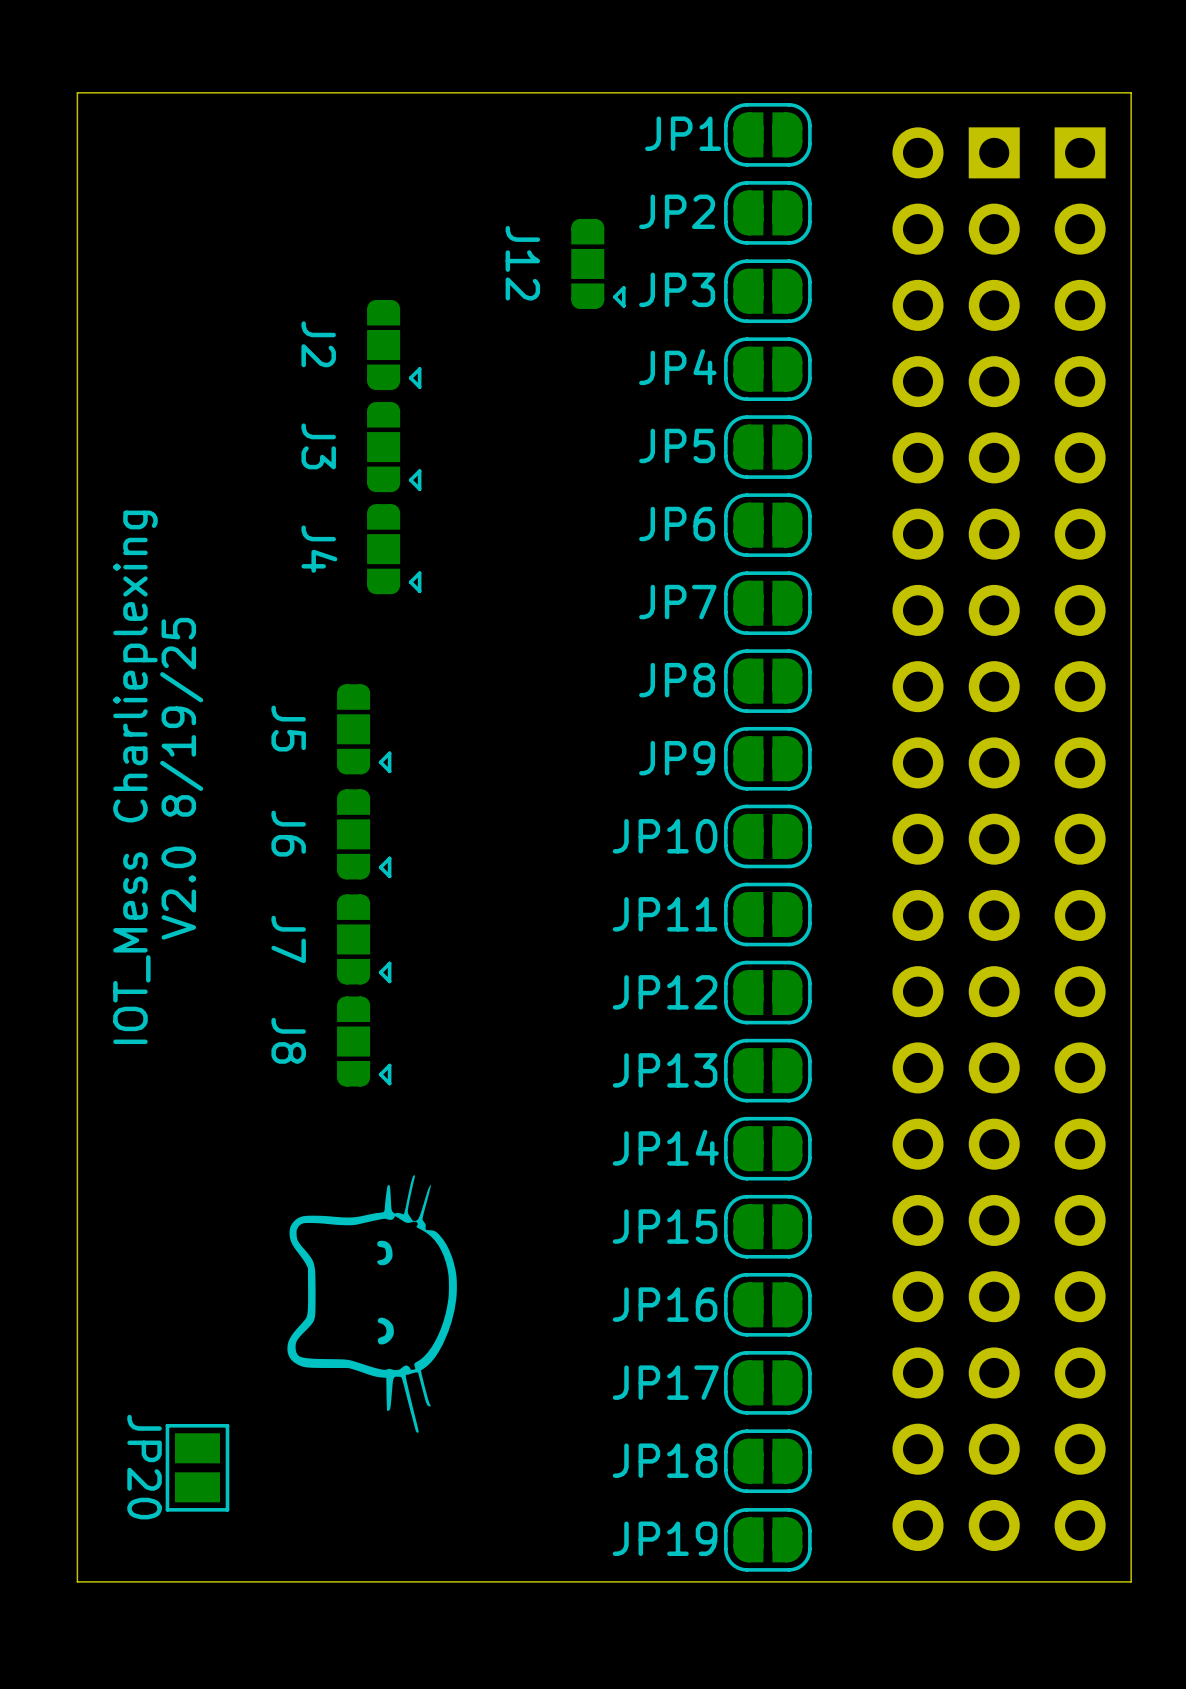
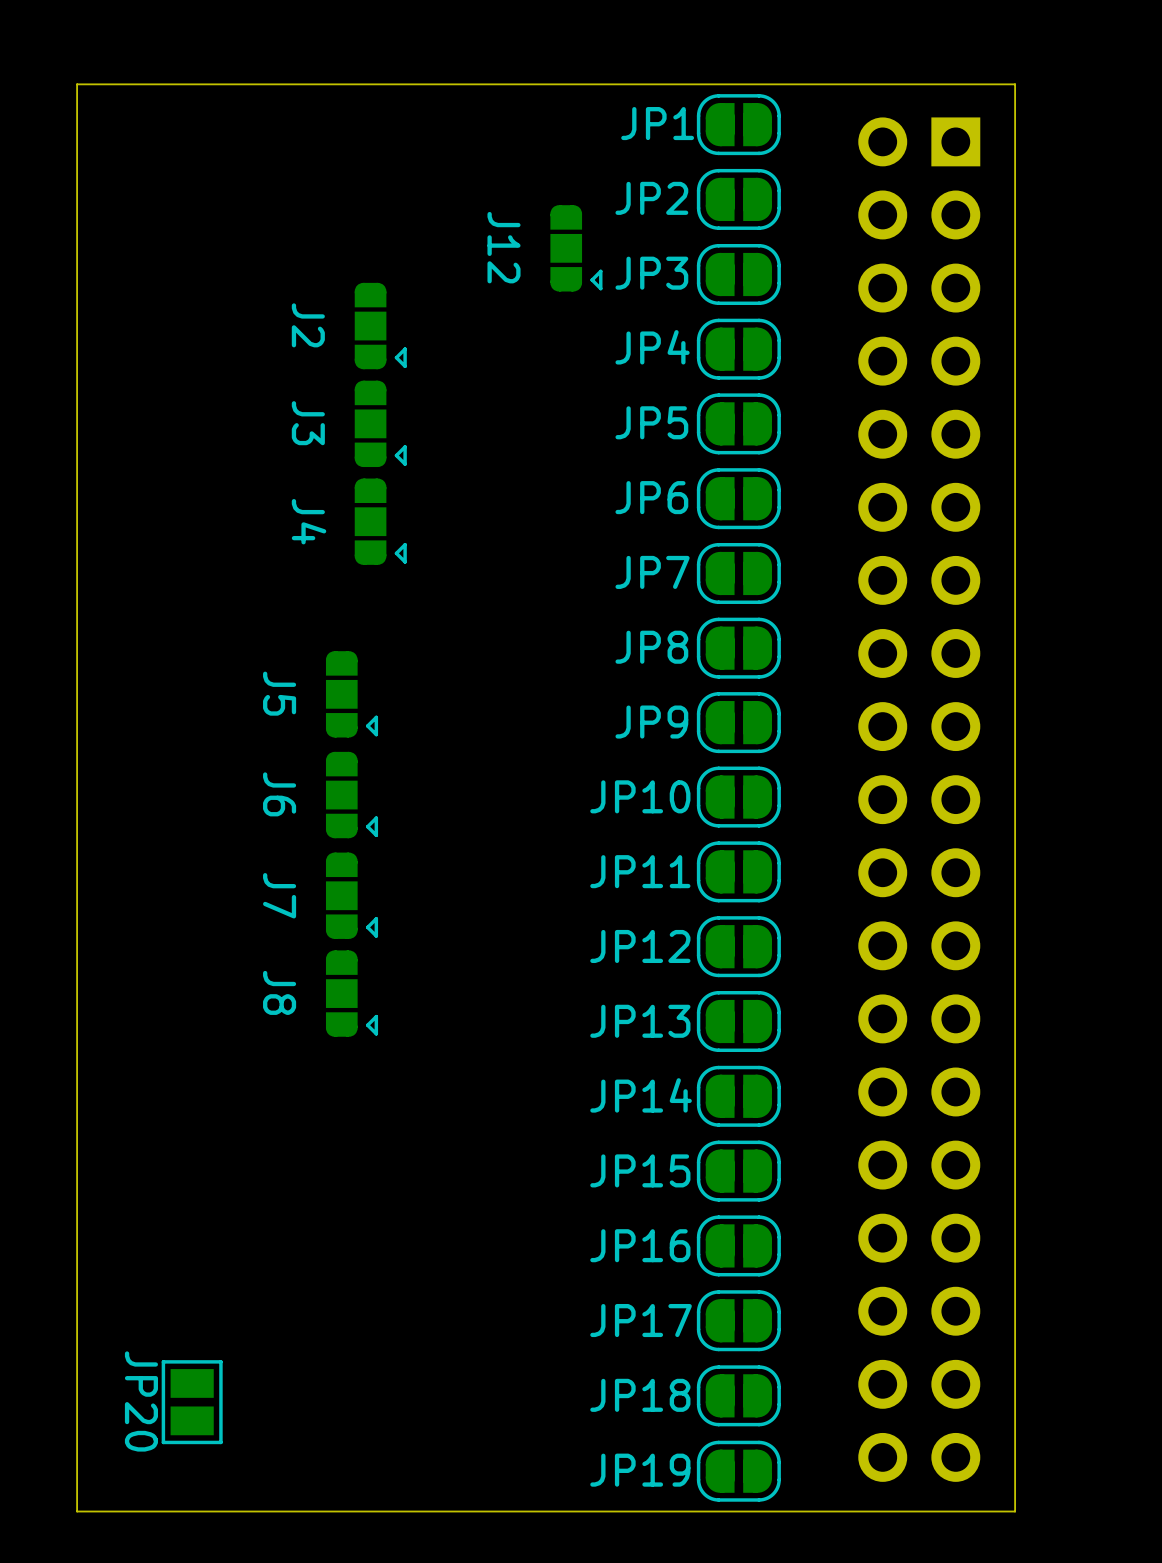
board edge: (1056, 92) (1131, 92) (1131, 1581) (1056, 1581) -> (1015, 84) (1015, 1511)
text: IOT_Mess Charlieplexing (135, 777) -> none
text: V2.0 8/19/25 (181, 778) -> none
part: (1080, 839) -> none
drawing: [287, 1175, 457, 1433] -> none

